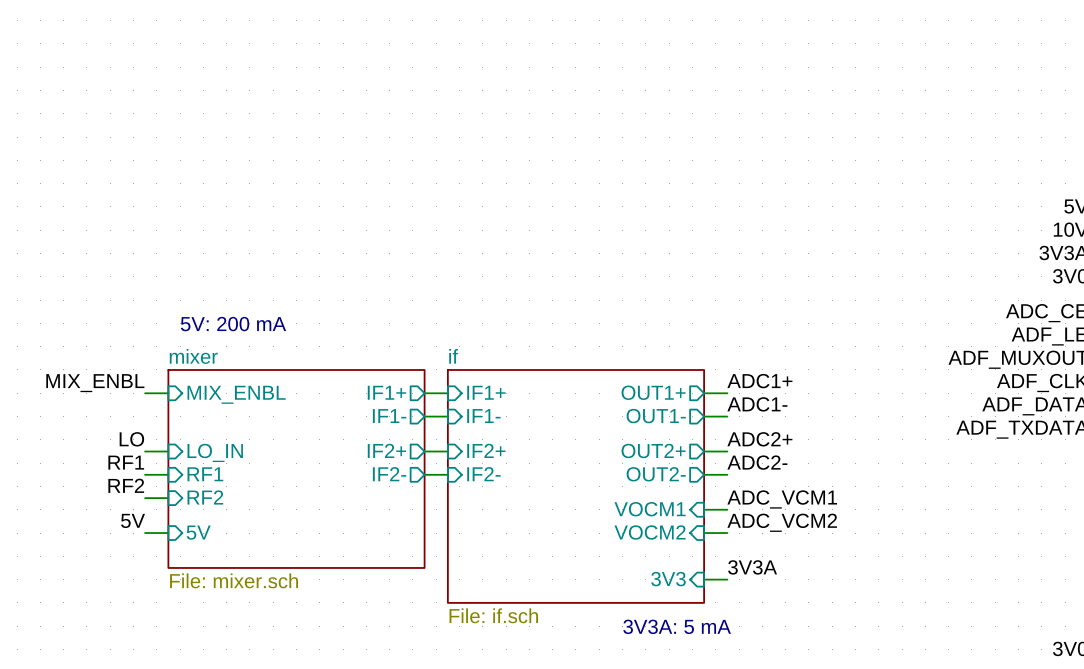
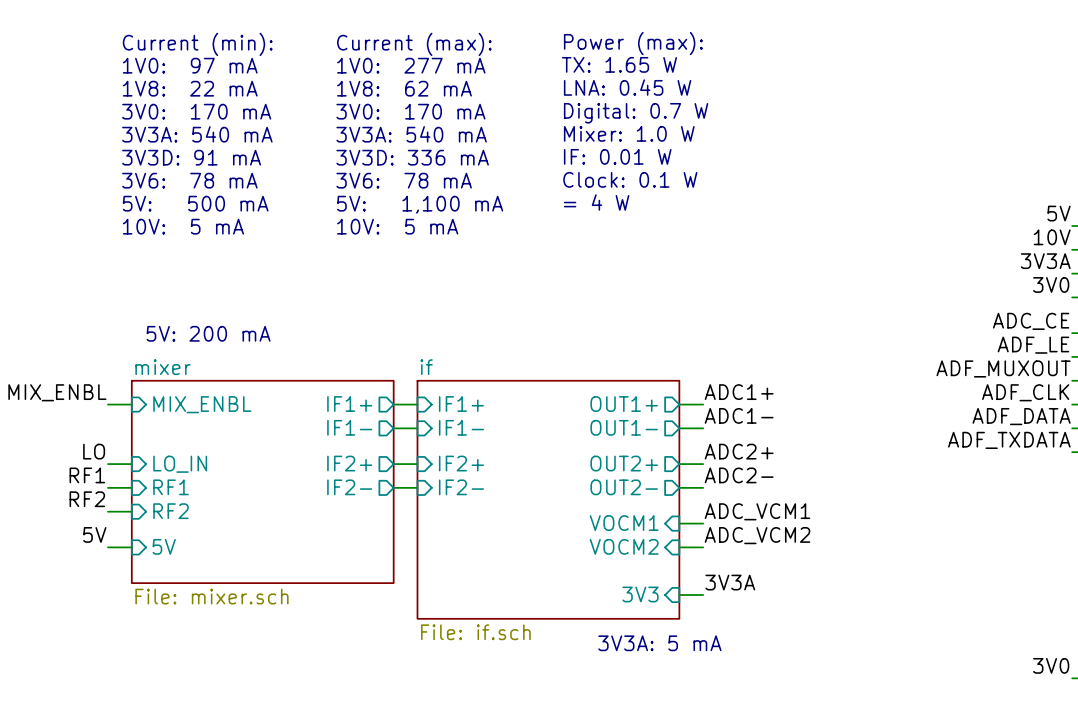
text: none -> Current (min): (197, 44)
text: none -> Current (max): (414, 44)
text: none -> Power (max): (633, 43)
text: none -> TX: 1.65 W (619, 64)
text: none -> 1V0: 97 mA (190, 65)
text: none -> 1V0: 277 mA (411, 65)
text: none -> LNA: 0.45 W (627, 87)
text: none -> 1V8: 22 mA (190, 88)
text: none -> 1V8: 62 mA (404, 88)
text: none -> 3V0: 170 mA (196, 111)
text: none -> 3V0: 170 mA (410, 111)
text: none -> Digital: 0.7 W (636, 113)
text: none -> Mixer: 1.0 W (629, 133)
text: none -> 3V3A: 540 mA (197, 134)
text: none -> 3V3A: 540 mA (411, 134)
text: none -> IF: 0.01 W (617, 156)
text: none -> 3V3D: 91 mA (191, 157)
text: none -> 3V3D: 336 mA (412, 157)
text: none -> Clock: 0.1 W (630, 179)
text: none -> 3V6: 78 mA (189, 180)
text: none -> 3V6: 78 mA (404, 180)
text: none -> = 4 W (596, 202)
text: none -> 5V: 500 mA (195, 203)
text: none -> 5V: 1,100 mA (420, 204)
text: none -> 10V: 5 mA (183, 226)
text: none -> 10V: 5 mA (397, 226)

